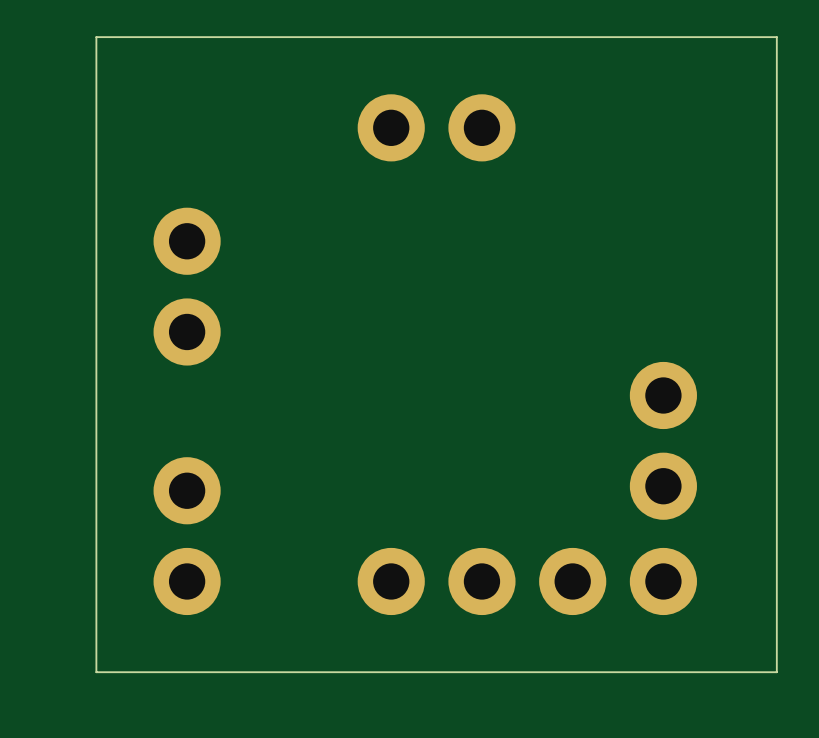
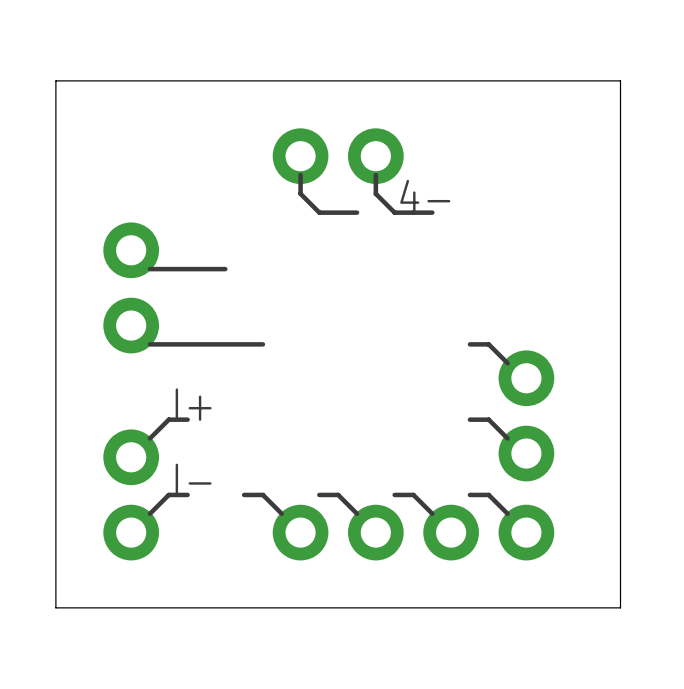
line: none -> (300, 175) (300, 193) (319, 212) (357, 212)
line: none -> (375, 175) (375, 193) (394, 212) (432, 212)
text: none -> 4- (425, 196)
line: none -> (225, 269) (150, 269)
line: none -> (262, 344) (150, 344)
line: none -> (469, 344) (488, 344) (507, 363)
text: none -> I+ (193, 404)
line: none -> (187, 419) (168, 419) (150, 438)
line: none -> (469, 419) (488, 419) (507, 438)
text: none -> I- (193, 479)
line: none -> (187, 494) (168, 494) (150, 513)
line: none -> (244, 494) (262, 494) (281, 513)
line: none -> (319, 494) (338, 494) (357, 513)
line: none -> (394, 494) (413, 494) (432, 513)
line: none -> (469, 494) (488, 494) (507, 513)

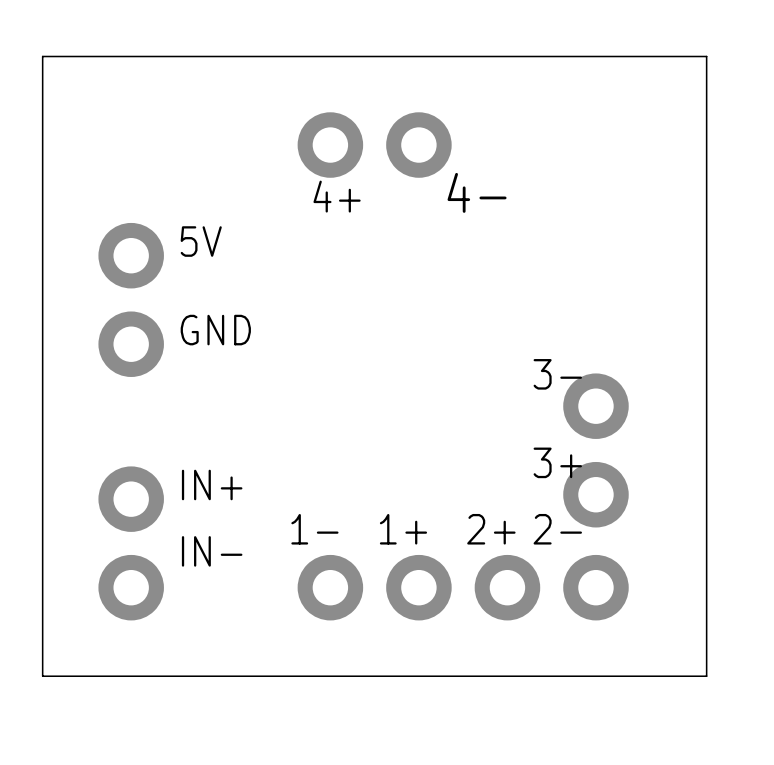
line: (300, 175) (300, 193) (319, 212) (357, 212) -> none
line: (375, 175) (375, 193) (394, 212) (432, 212) -> none
text: none -> 4+ (337, 196)
text: none -> 5V (201, 241)
line: (225, 269) (150, 269) -> none
text: none -> GND (215, 330)
line: (262, 344) (150, 344) -> none
line: (469, 344) (488, 344) (507, 363) -> none
text: none -> 3- (557, 374)
text: I+ (193, 404) -> IN+ (212, 484)
line: (187, 419) (168, 419) (150, 438) -> none
line: (469, 419) (488, 419) (507, 438) -> none
text: none -> 3+ (557, 462)
text: I- (193, 479) -> IN- (212, 551)
text: none -> 1- (314, 529)
text: none -> 1+ (403, 529)
text: none -> 2+ (491, 529)
text: none -> 2- (557, 529)
line: (187, 494) (168, 494) (150, 513) -> none
line: (244, 494) (262, 494) (281, 513) -> none
line: (319, 494) (338, 494) (357, 513) -> none
line: (394, 494) (413, 494) (432, 513) -> none
line: (469, 494) (488, 494) (507, 513) -> none

